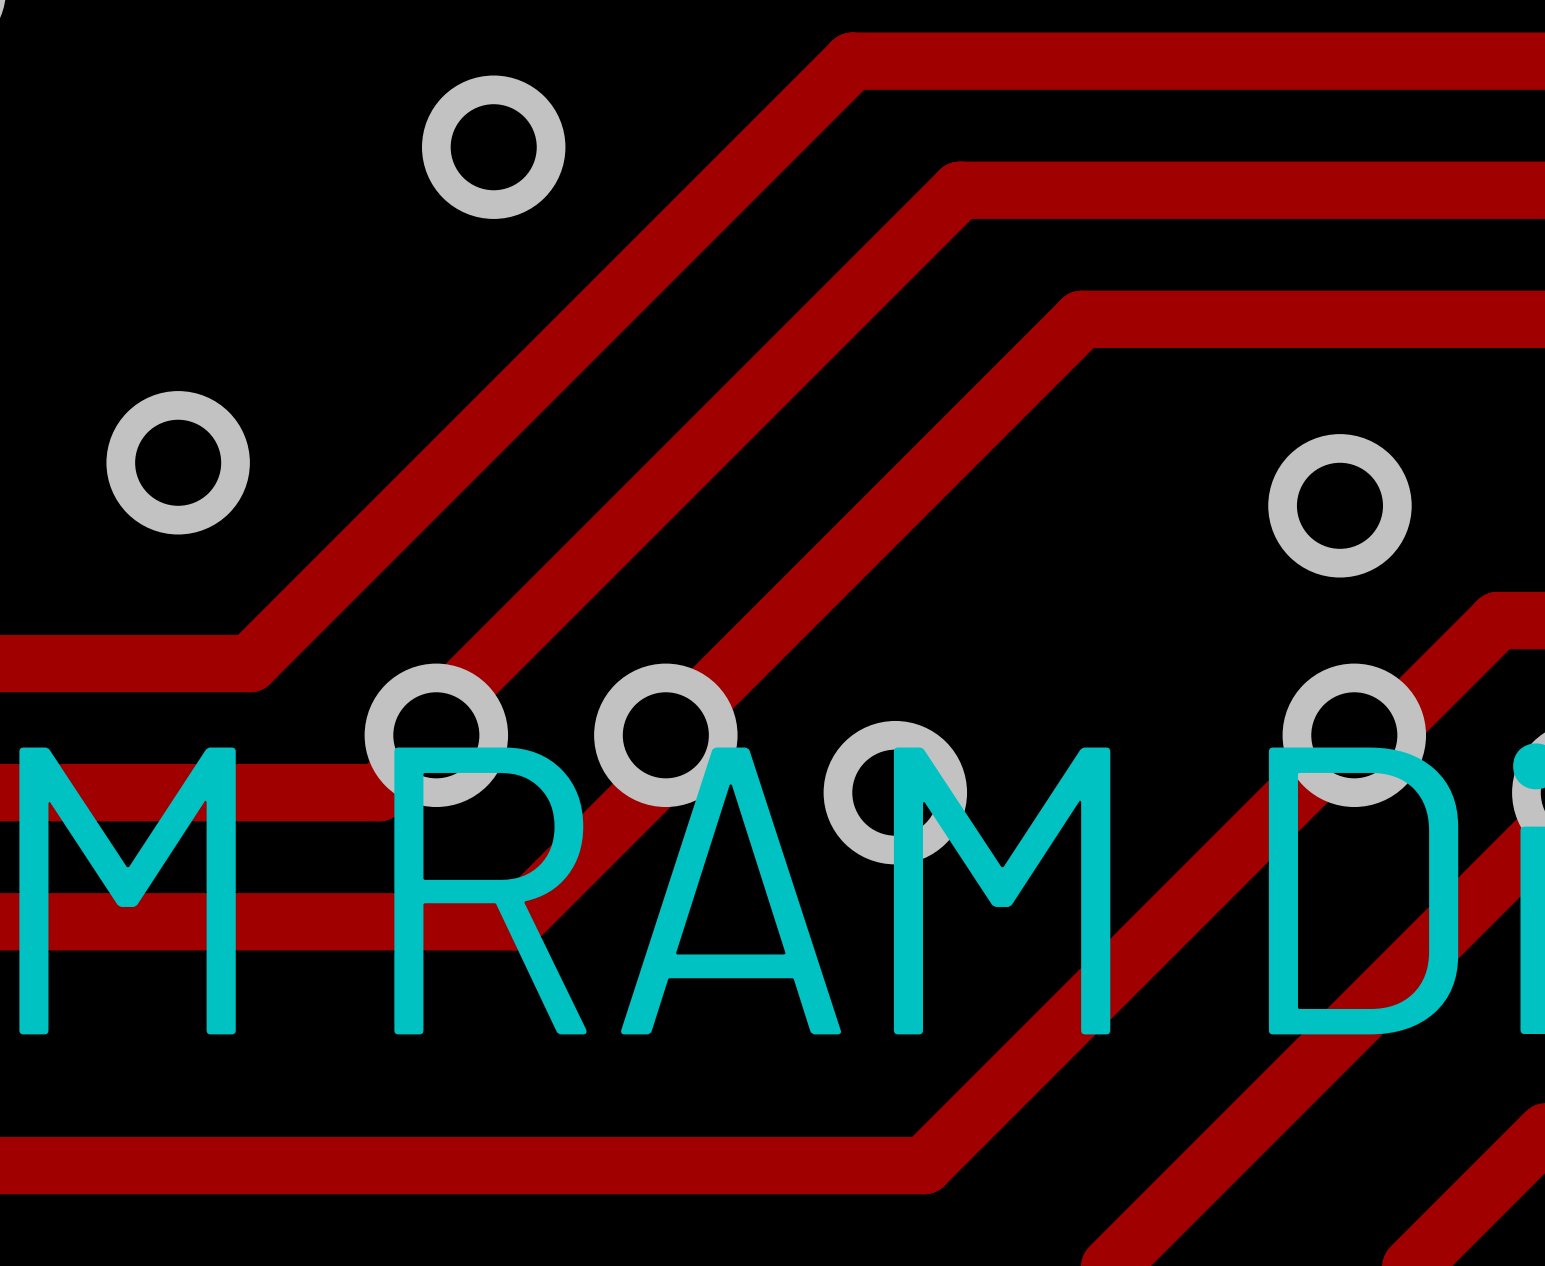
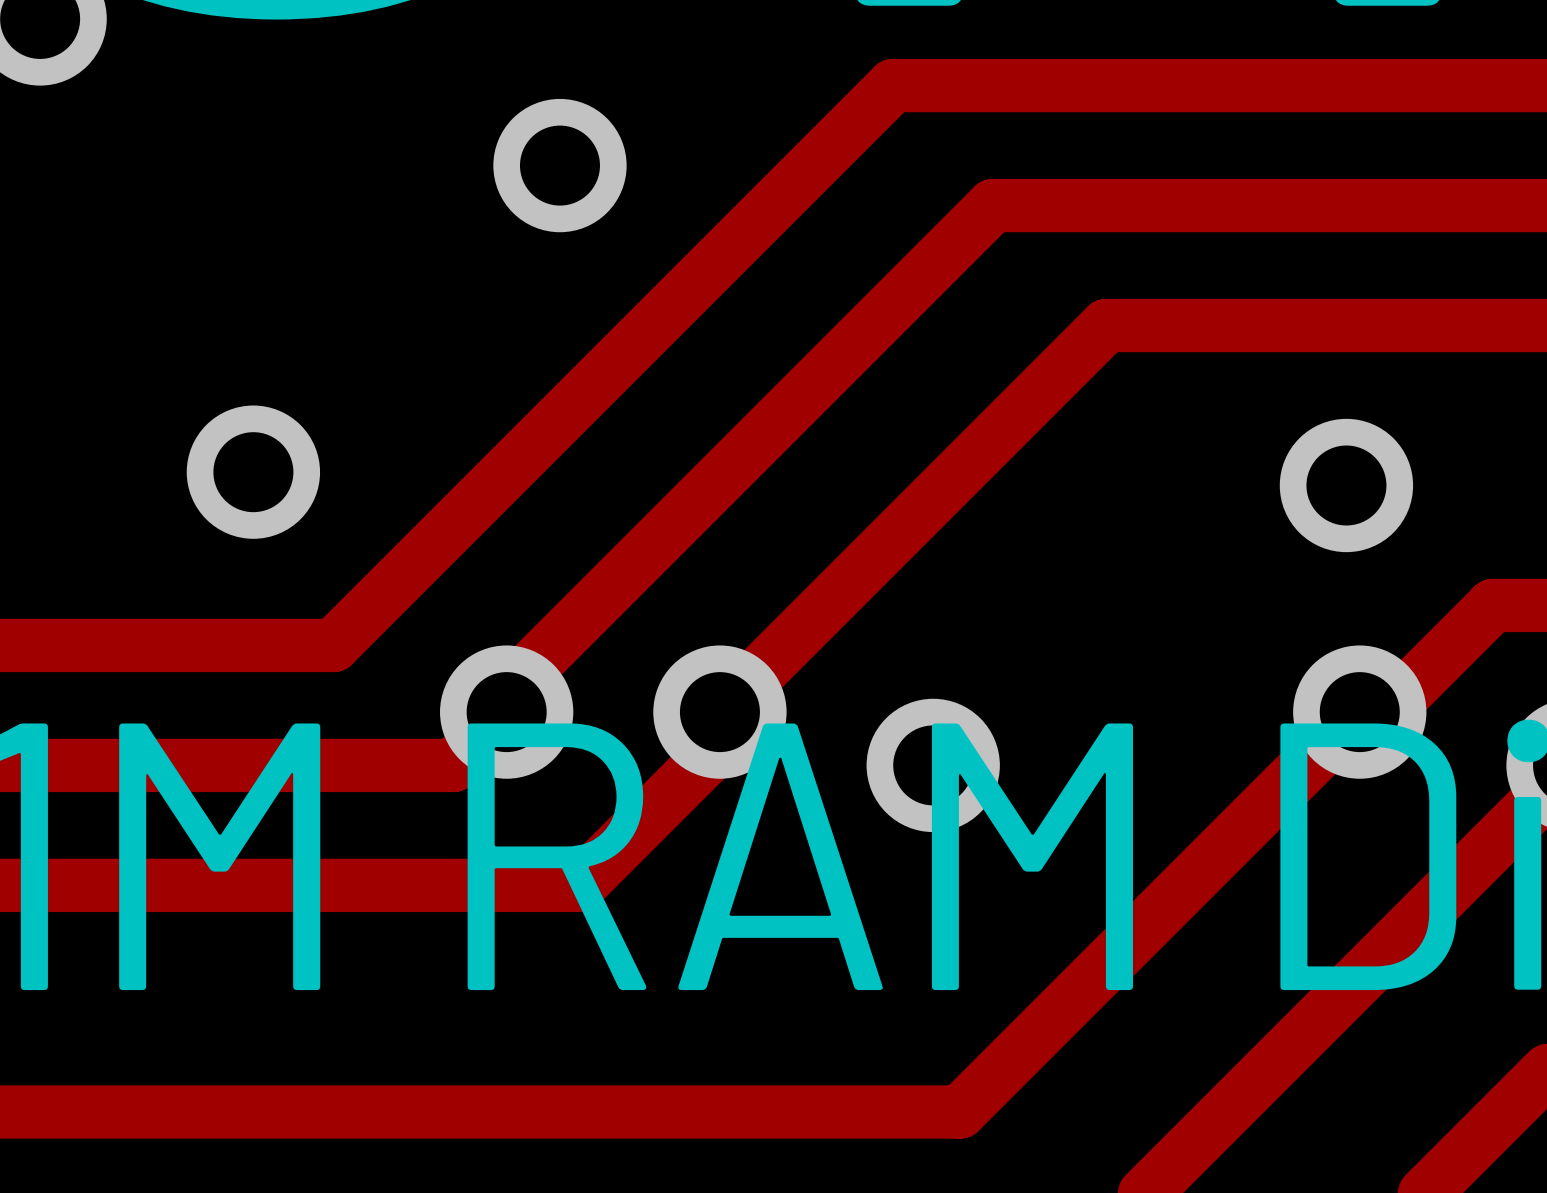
via position: (178, 462) -> (253, 472)
via position: (1339, 505) -> (1346, 485)

